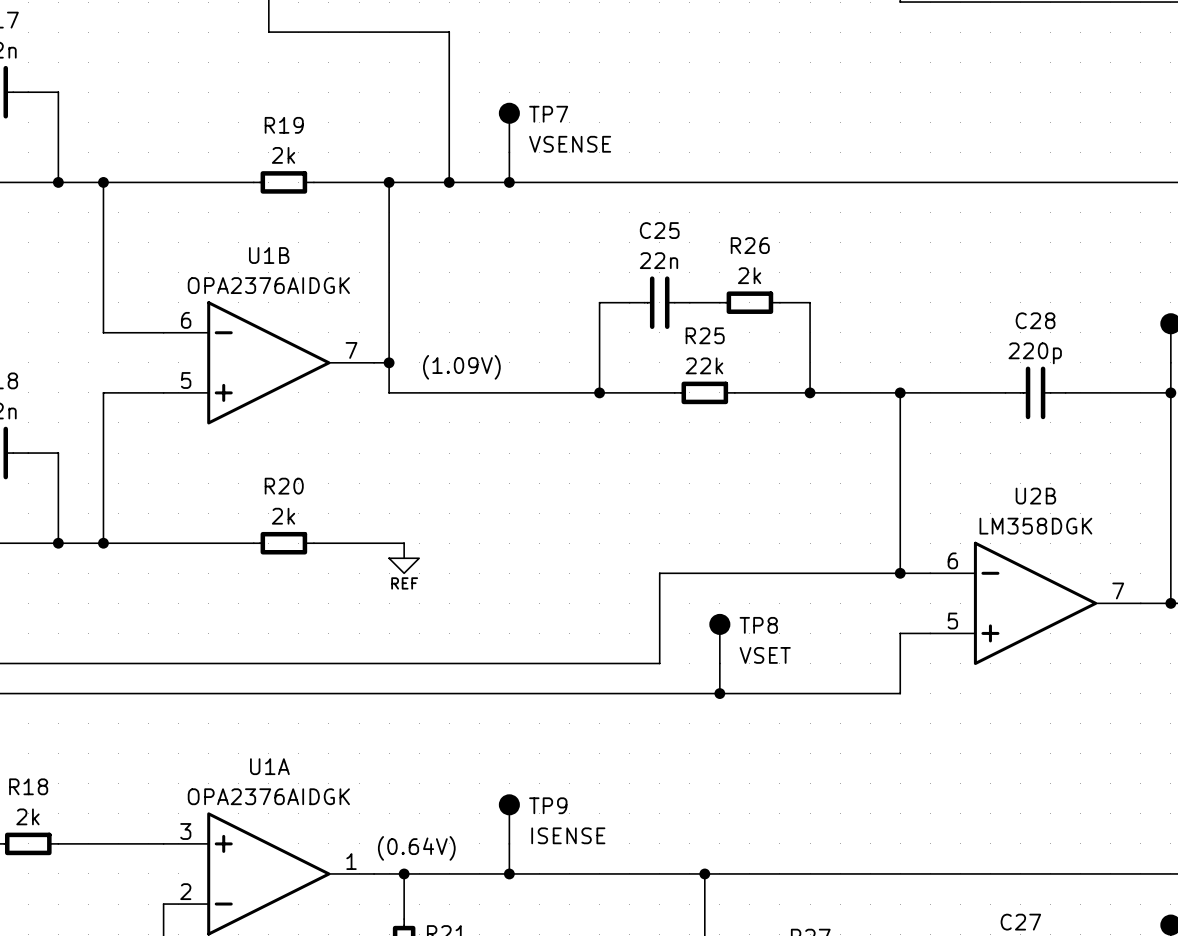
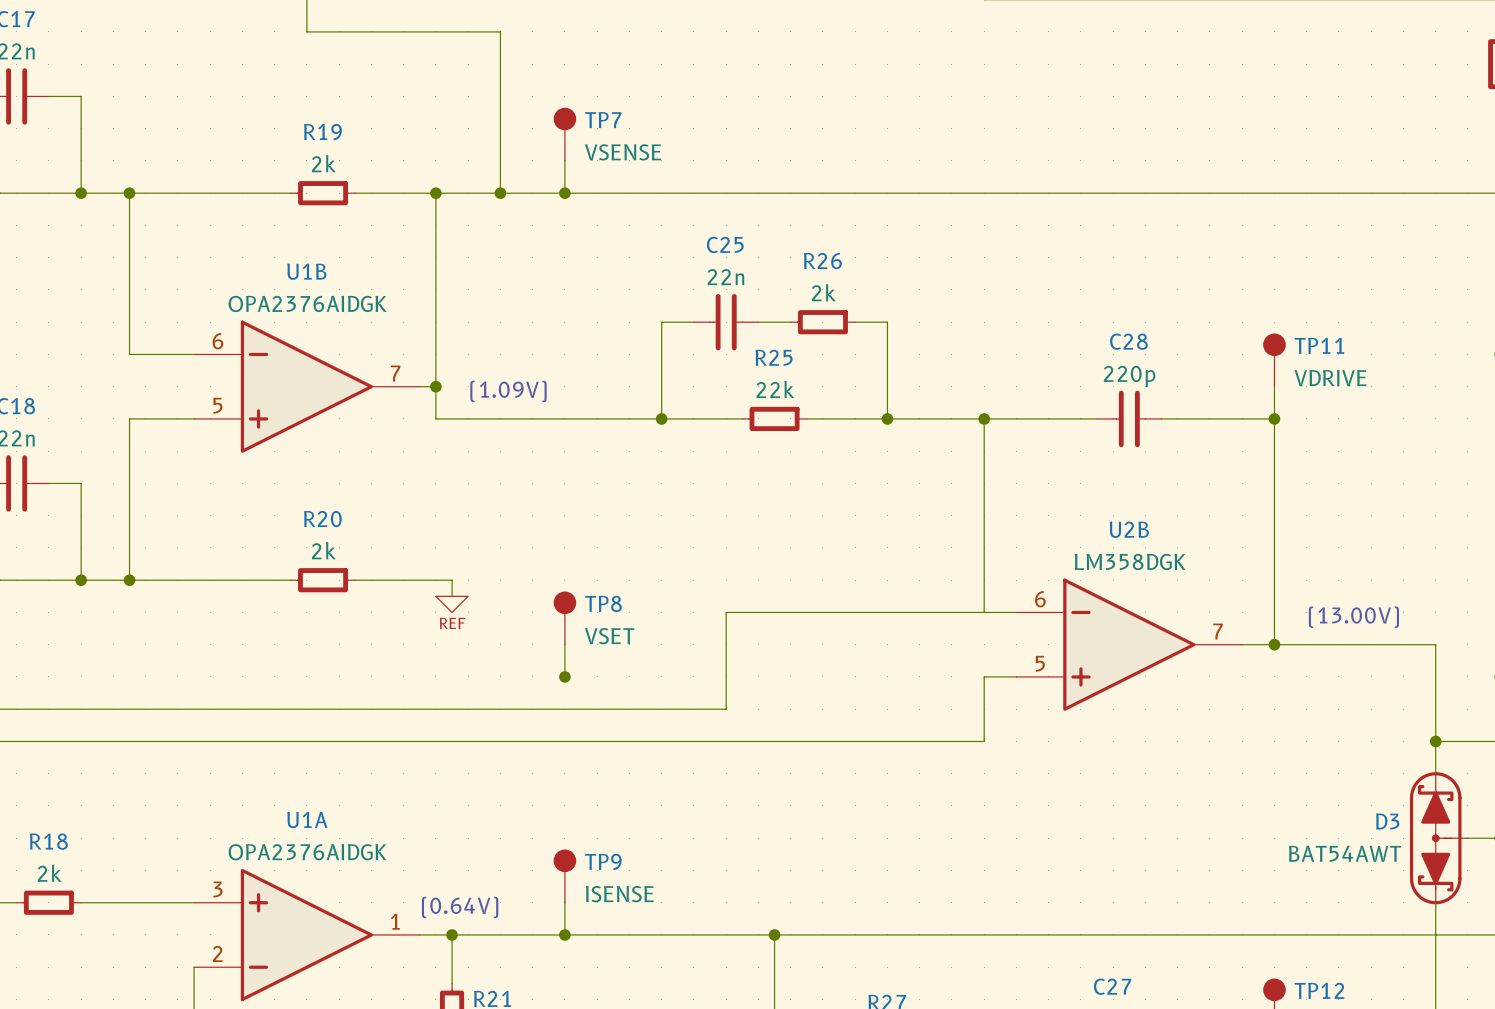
junction: (900, 573) -> none
junction: none -> (564, 676)
TP8 position: (719, 638) -> (564, 618)
wire: (719, 663) (719, 693) -> (564, 644) (564, 676)
junction: (719, 693) -> none

